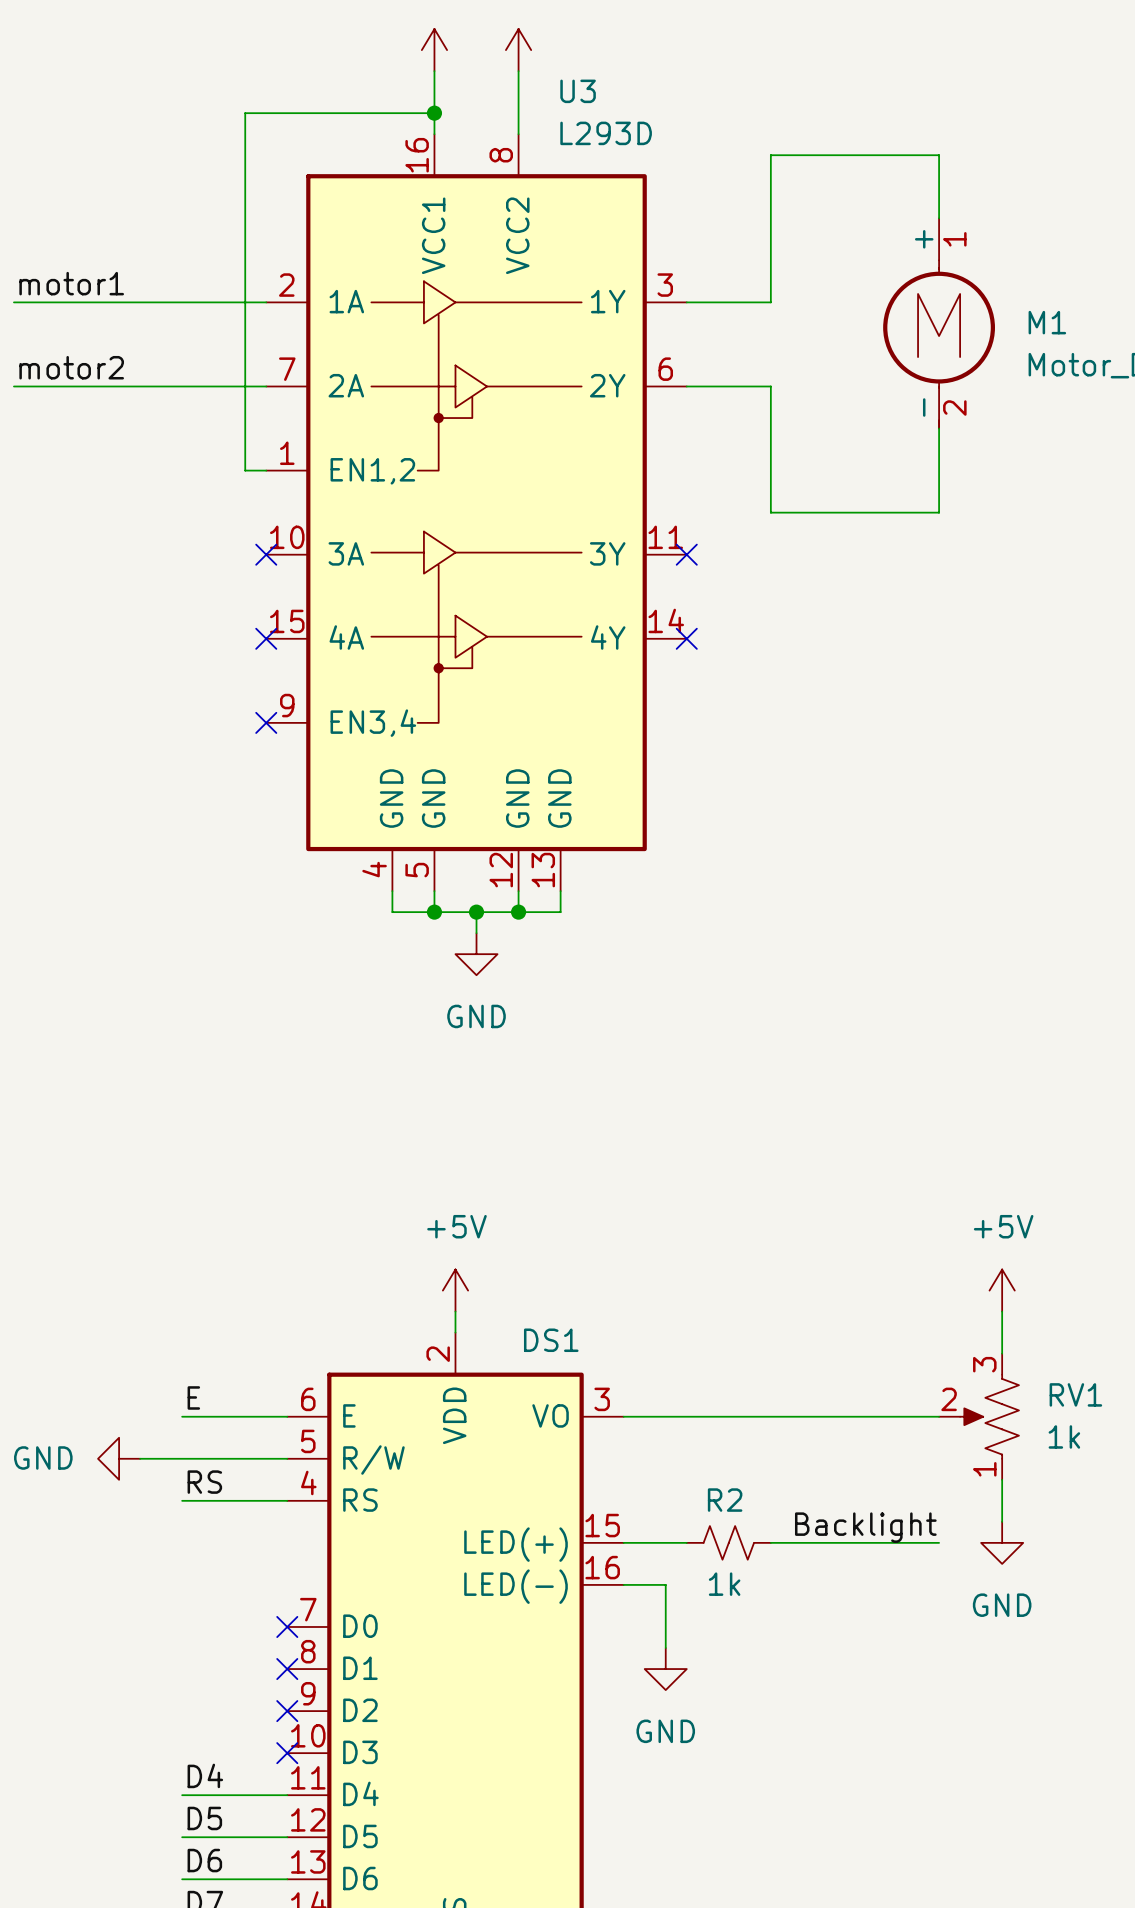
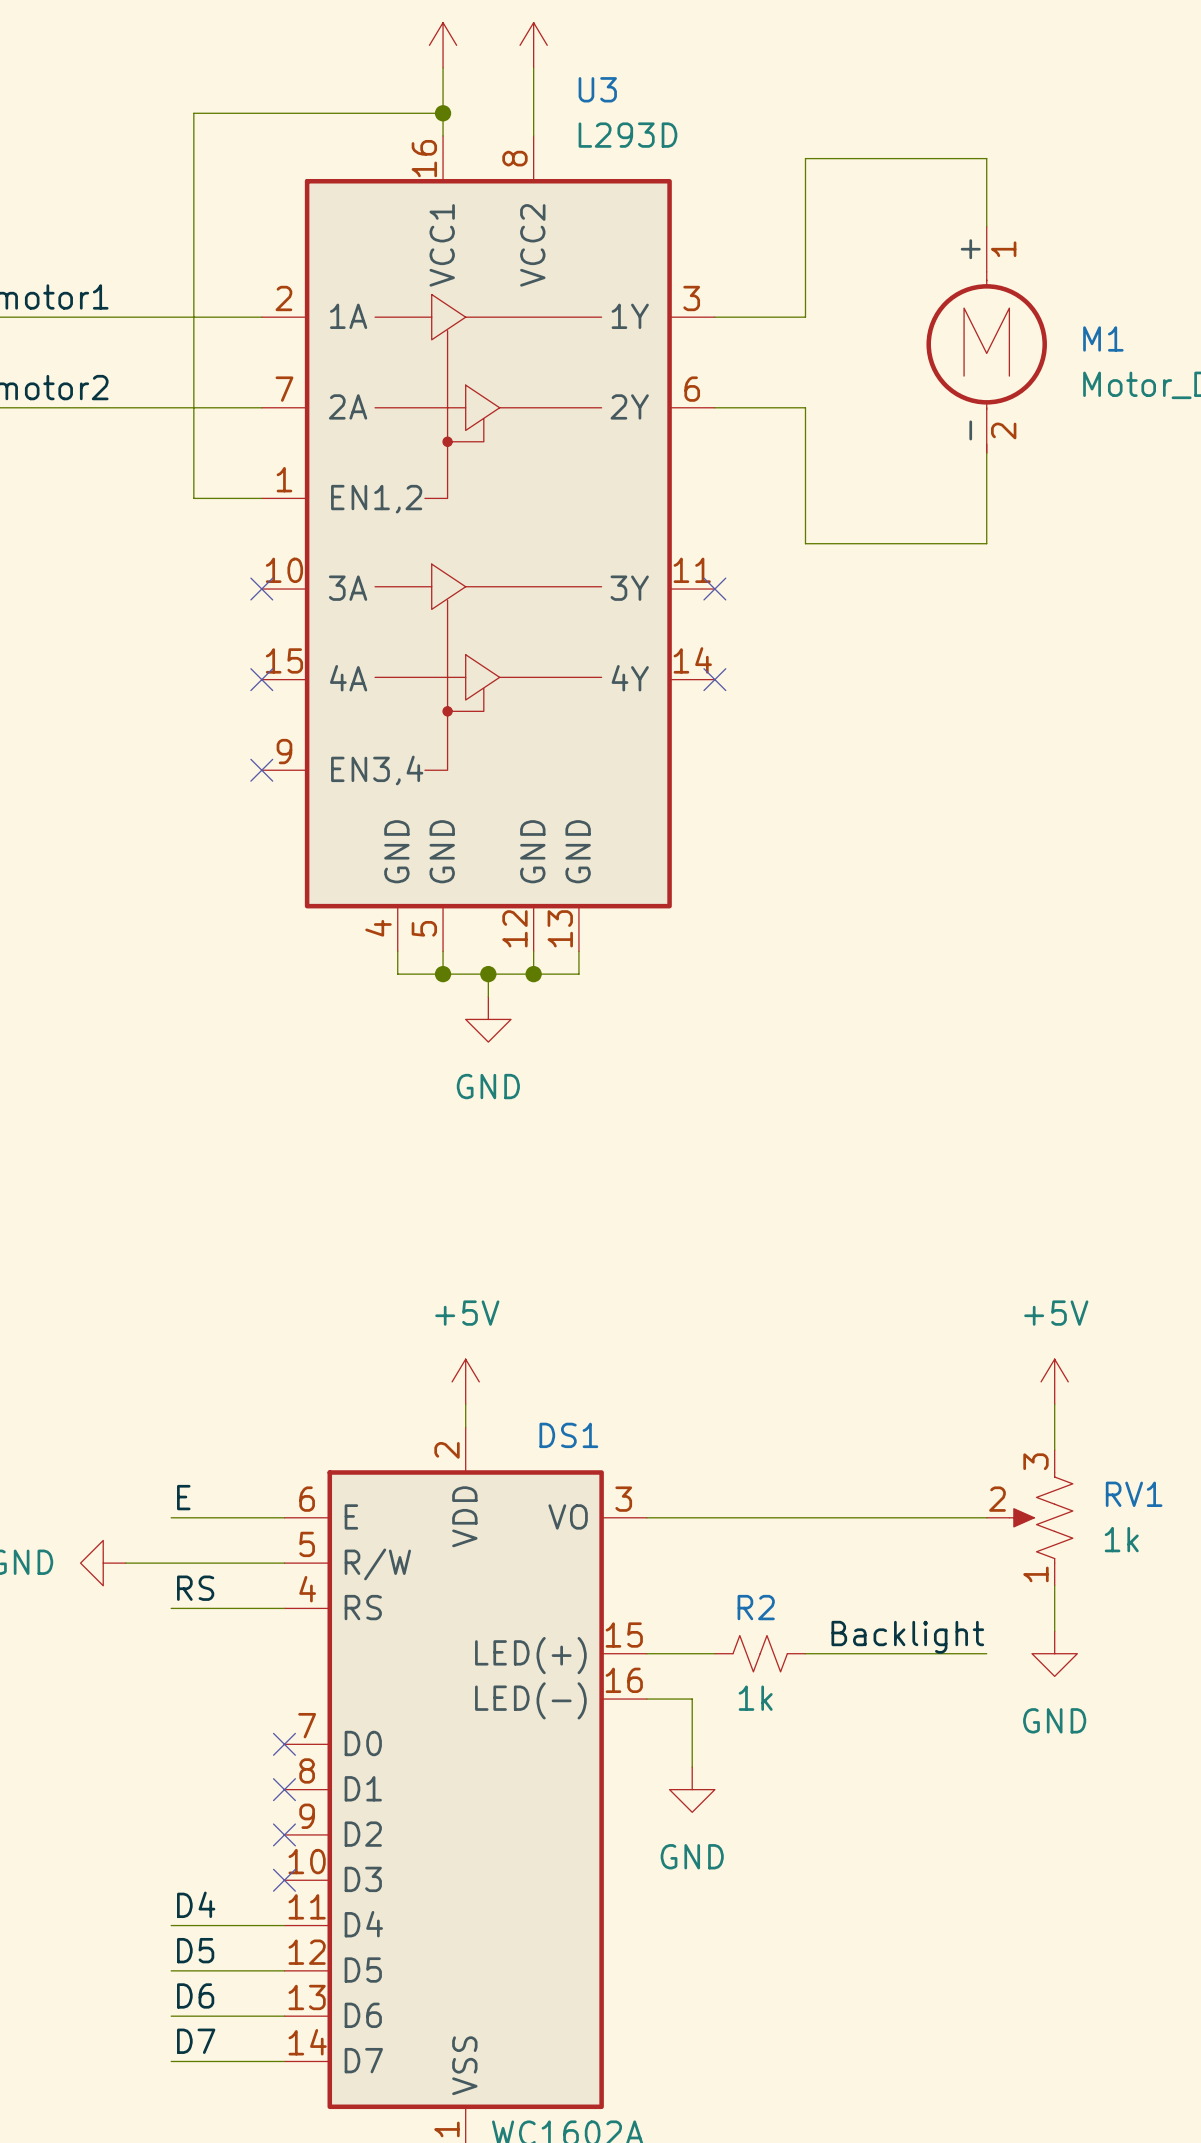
wire: (245, 113) (245, 470) -> (239, 113) (193, 113) (193, 498) (239, 498)

